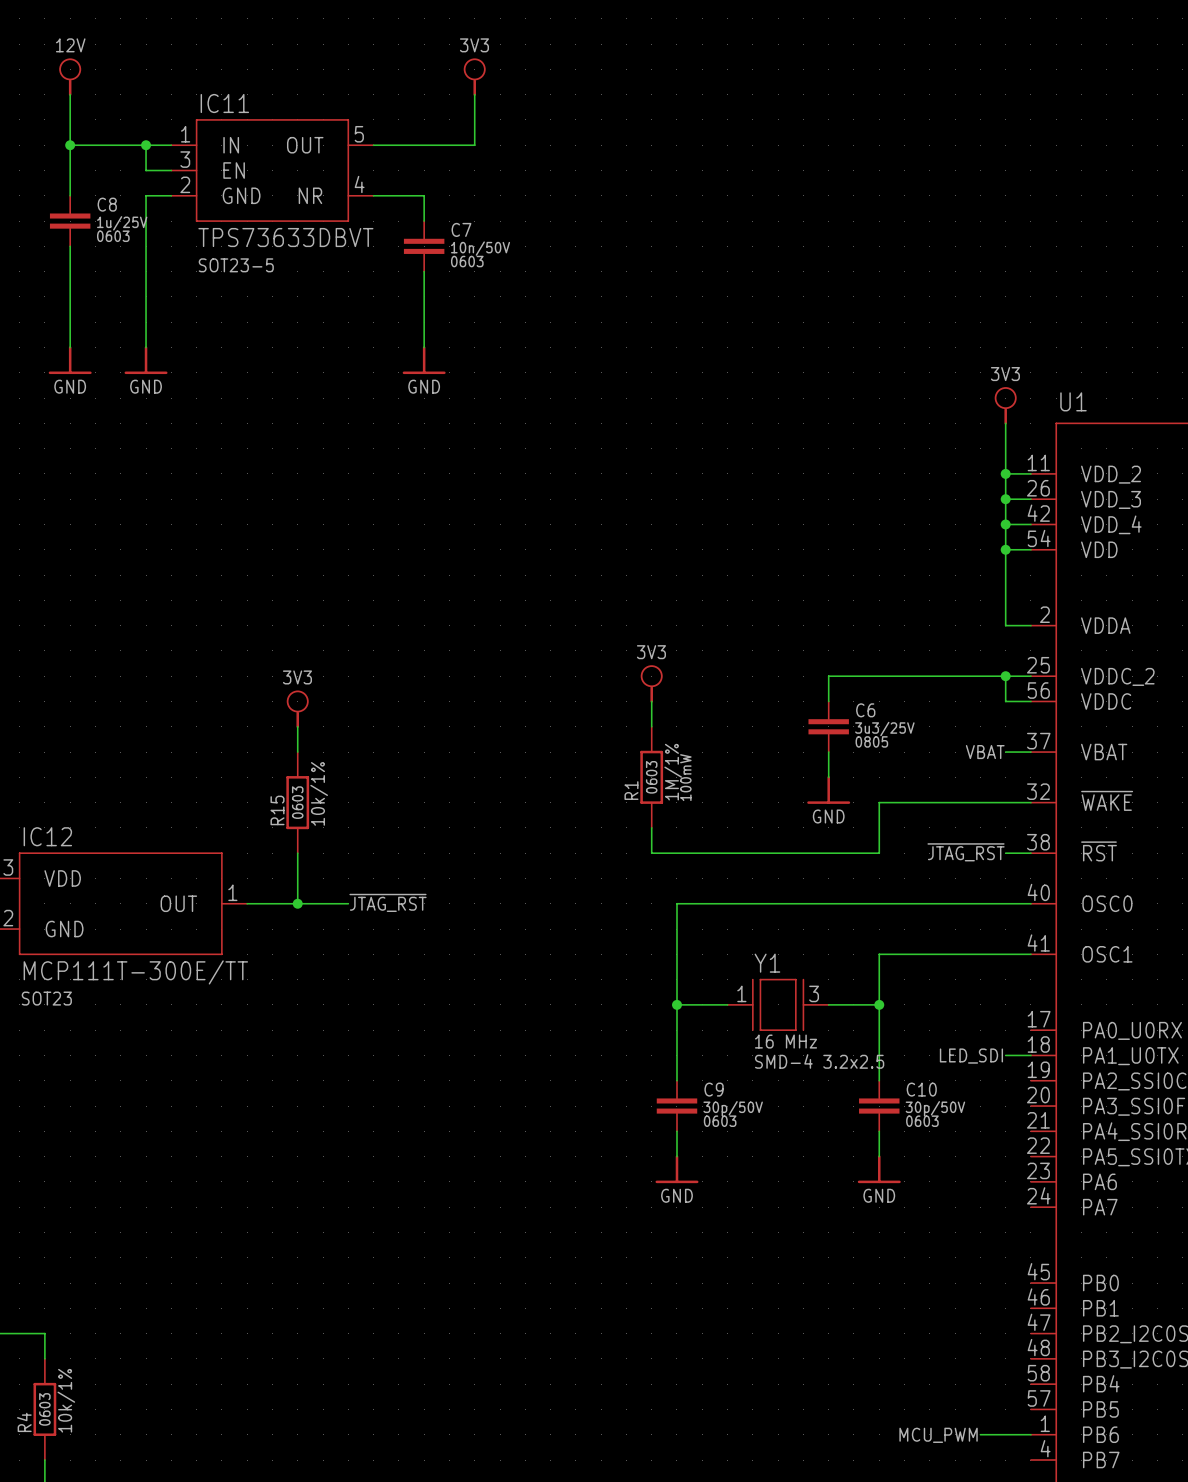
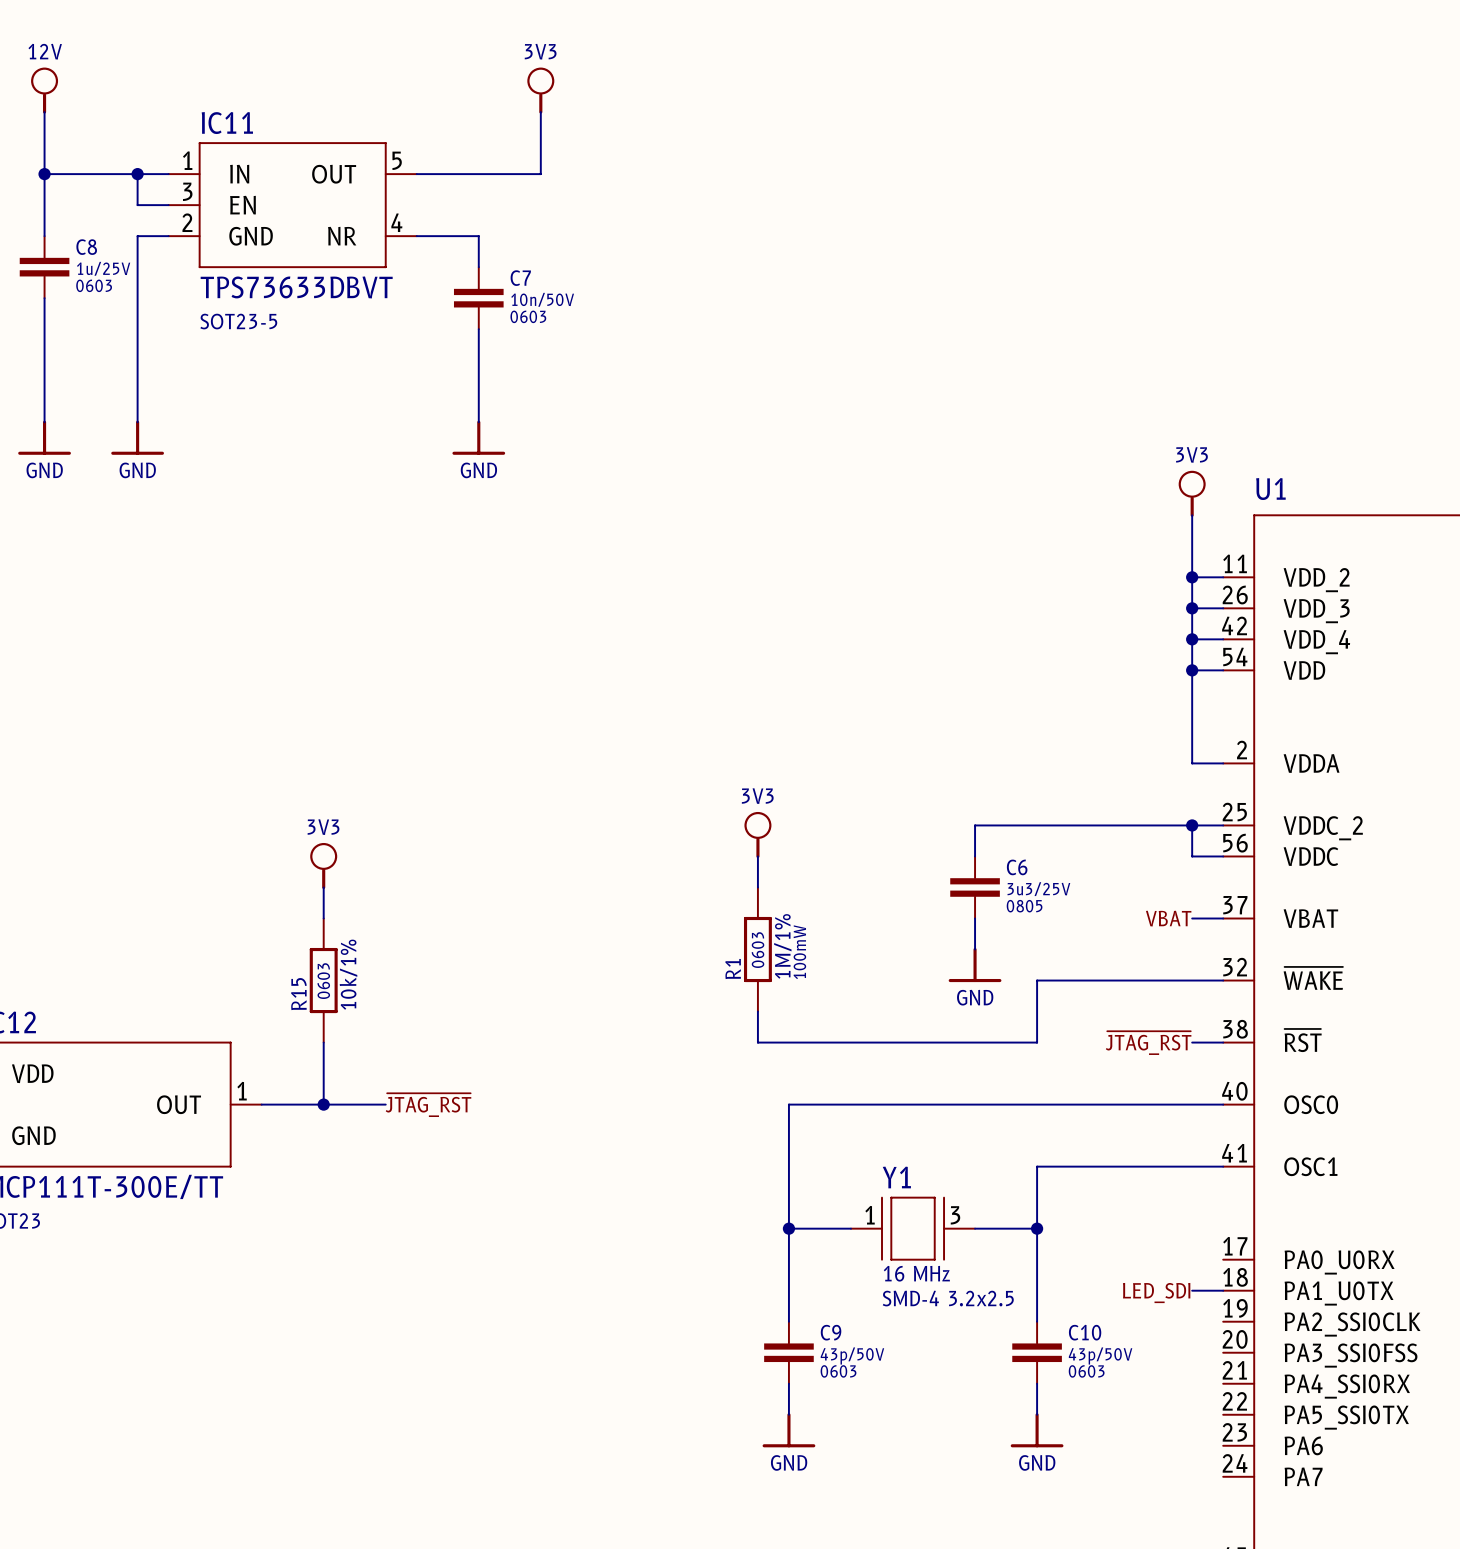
C9 value: 30p/50V (733, 1108) -> 43p/50V (852, 1356)
C10 value: 30p/50V (935, 1108) -> 43p/50V (1100, 1356)

